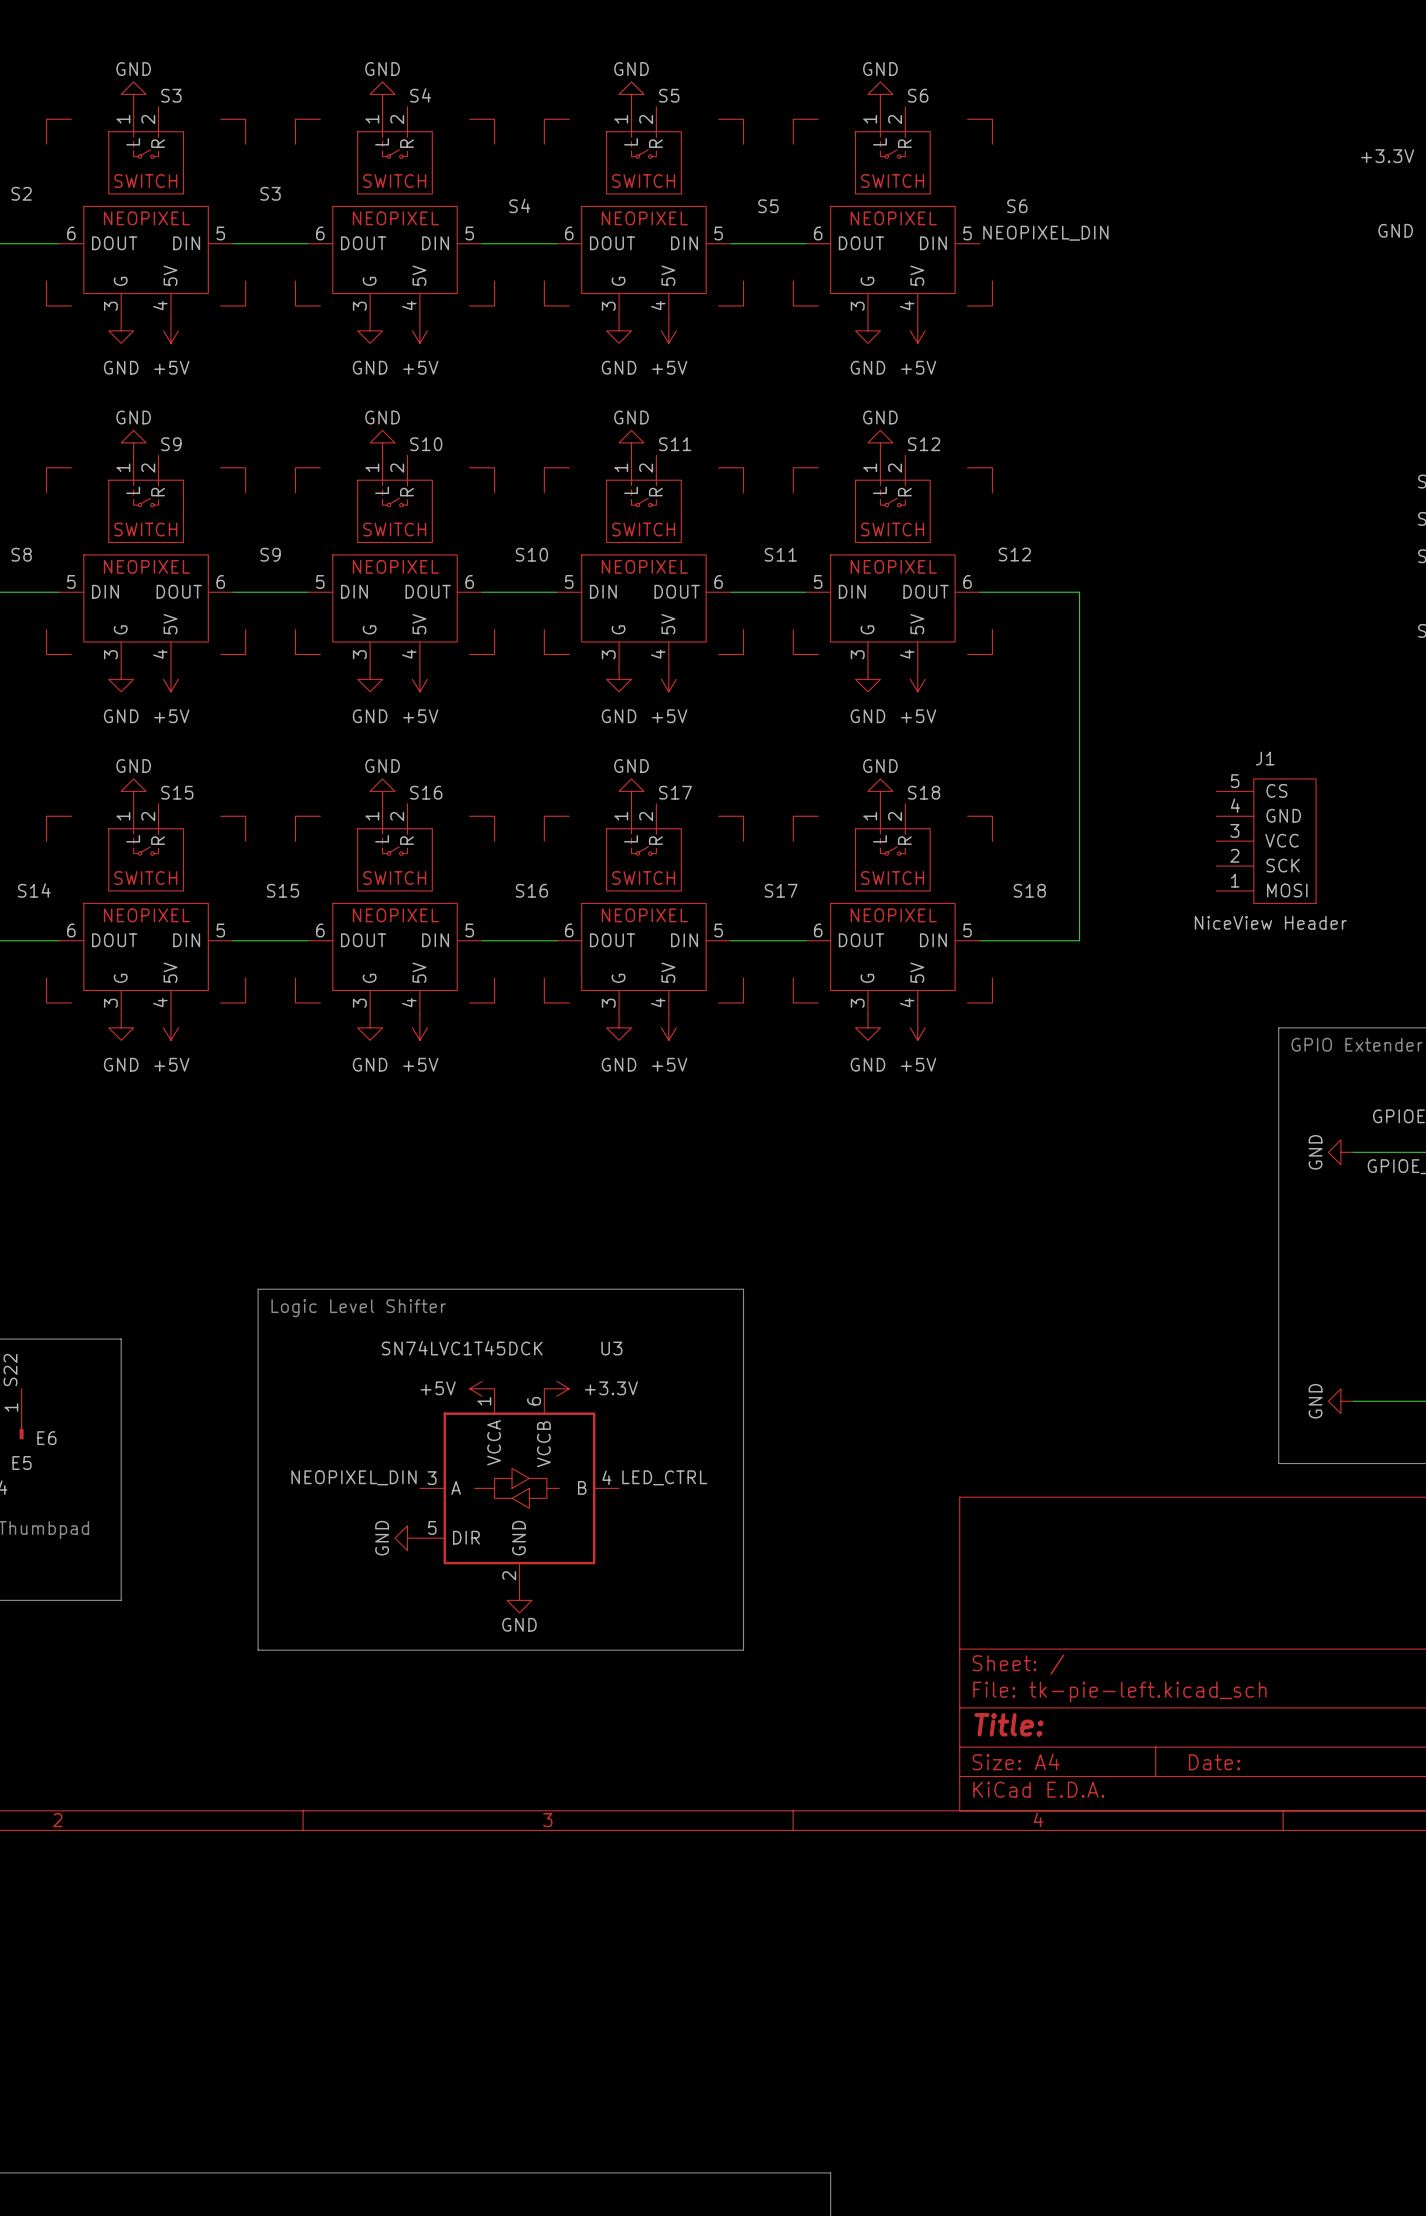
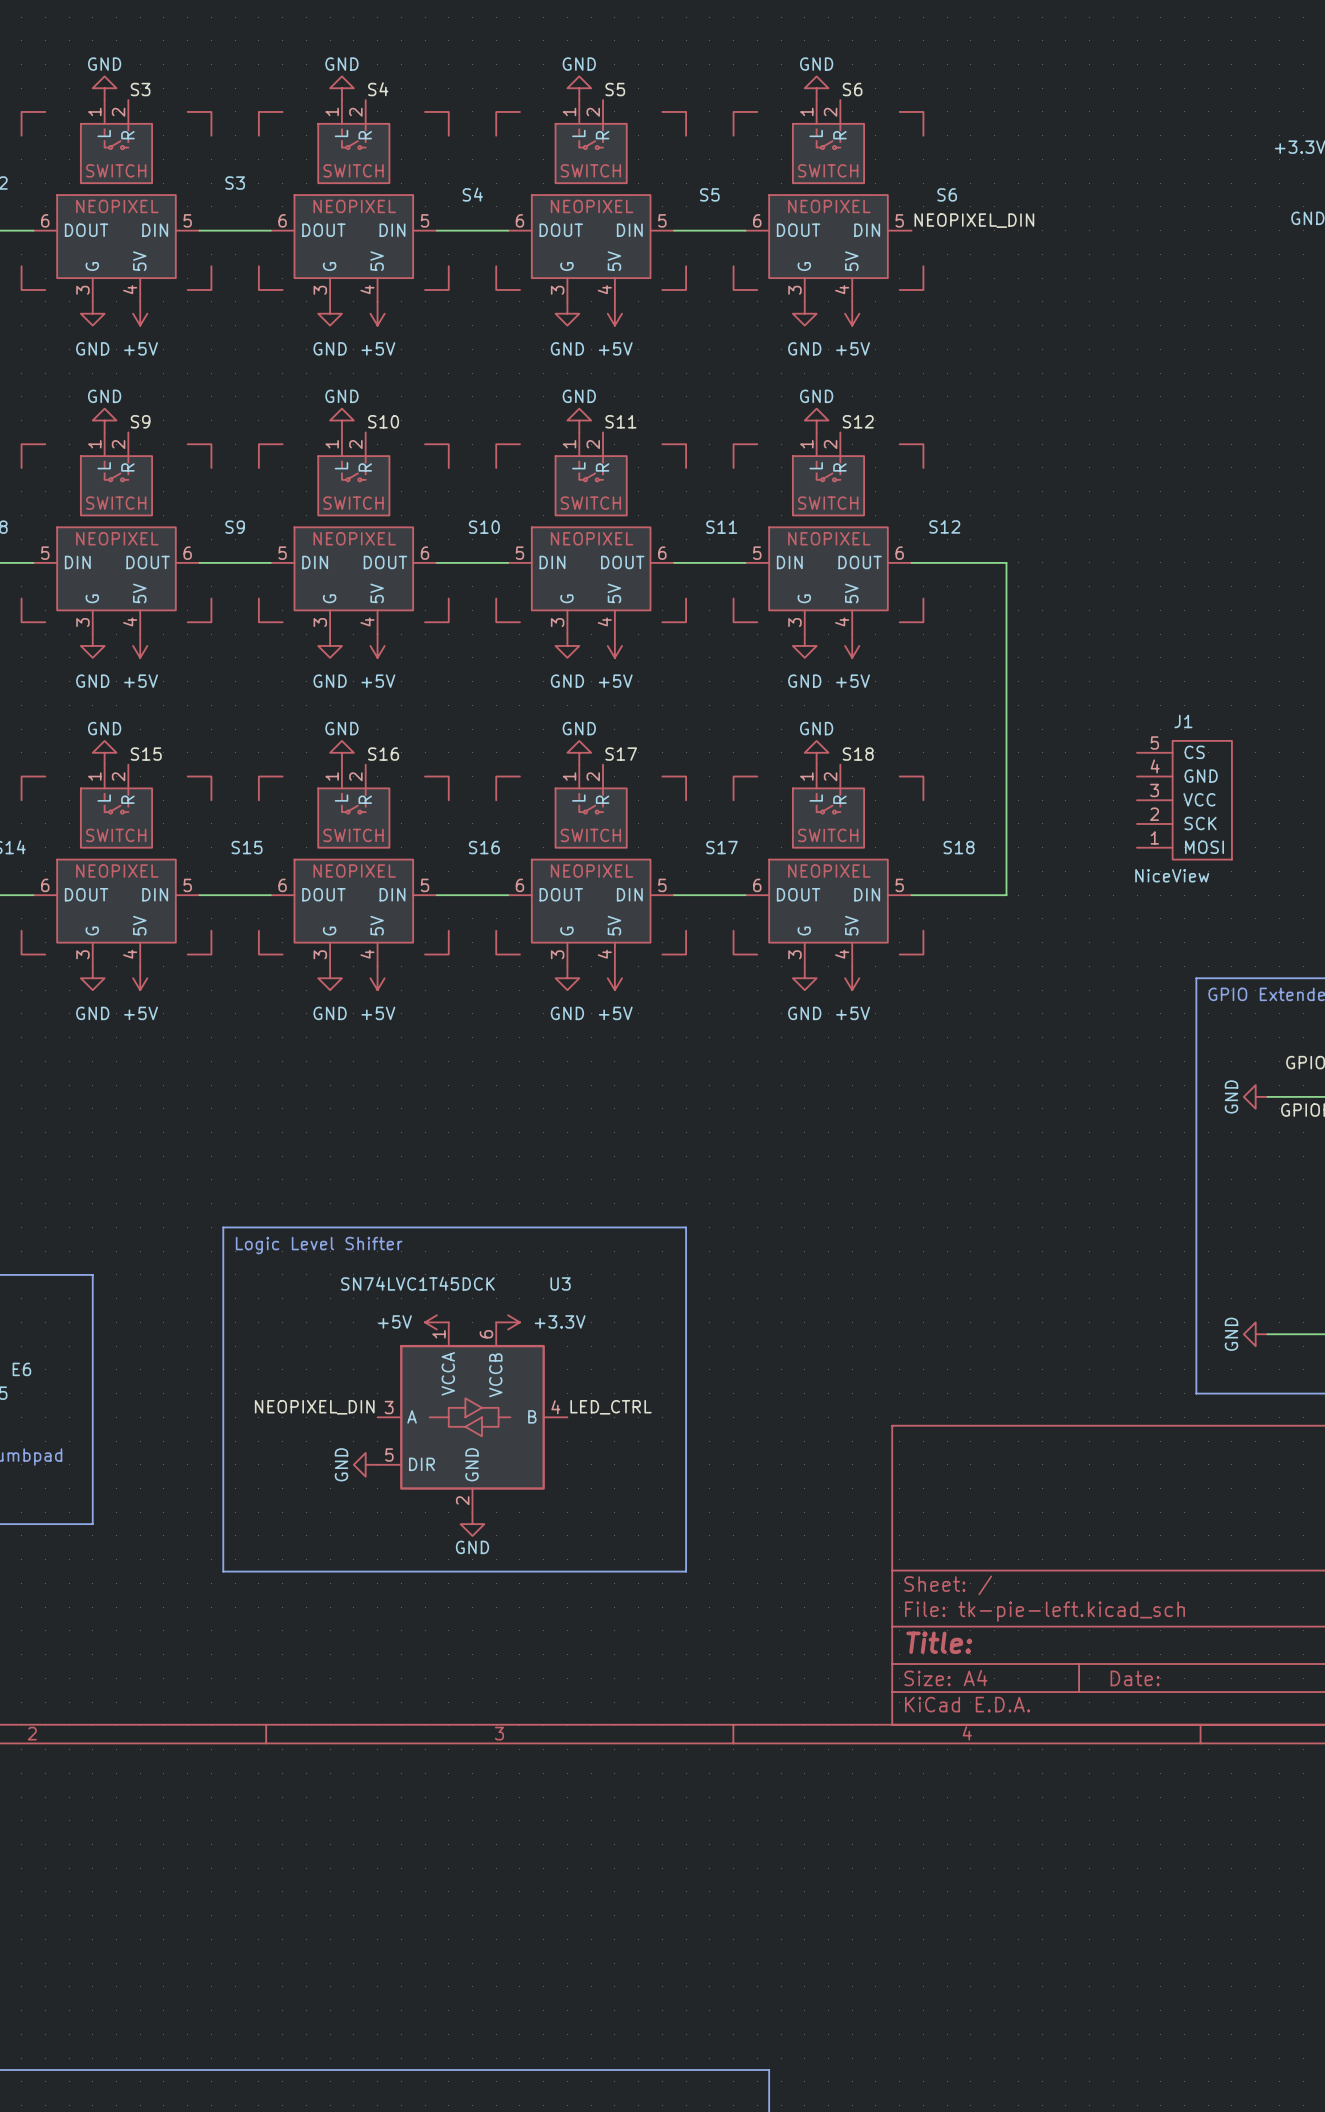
J1 value: NiceView Header (1270, 922) -> NiceView (1172, 875)

